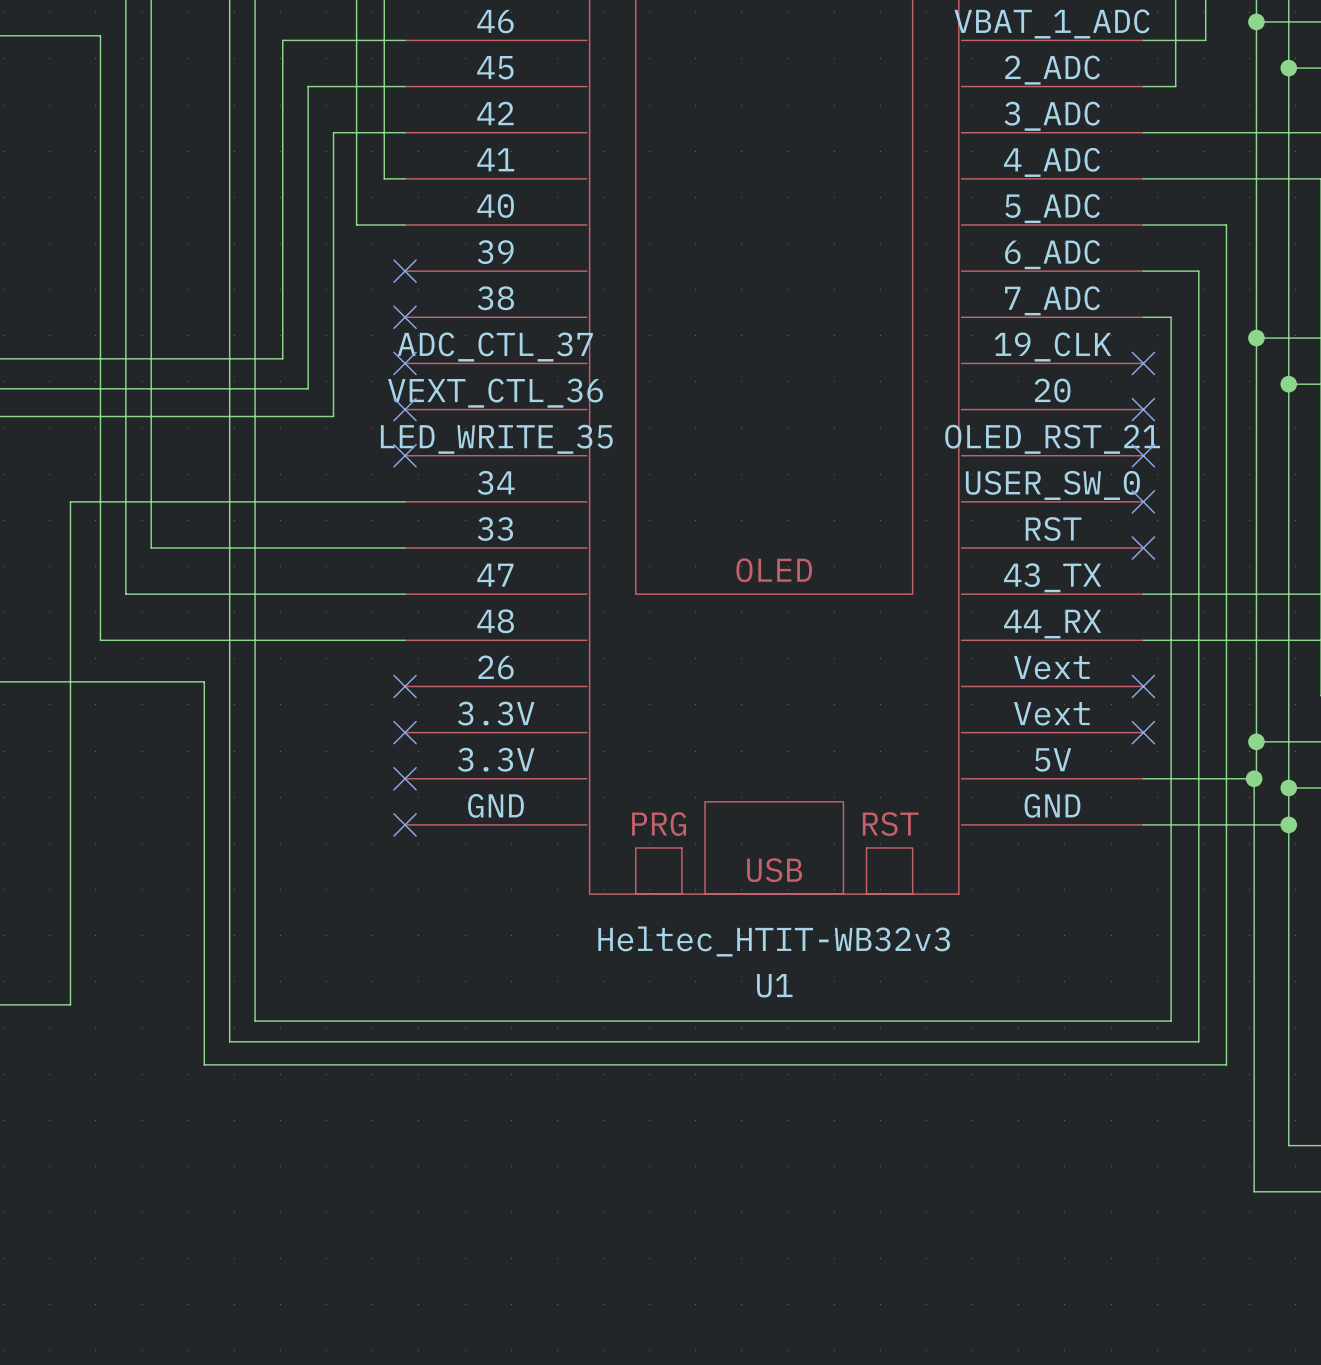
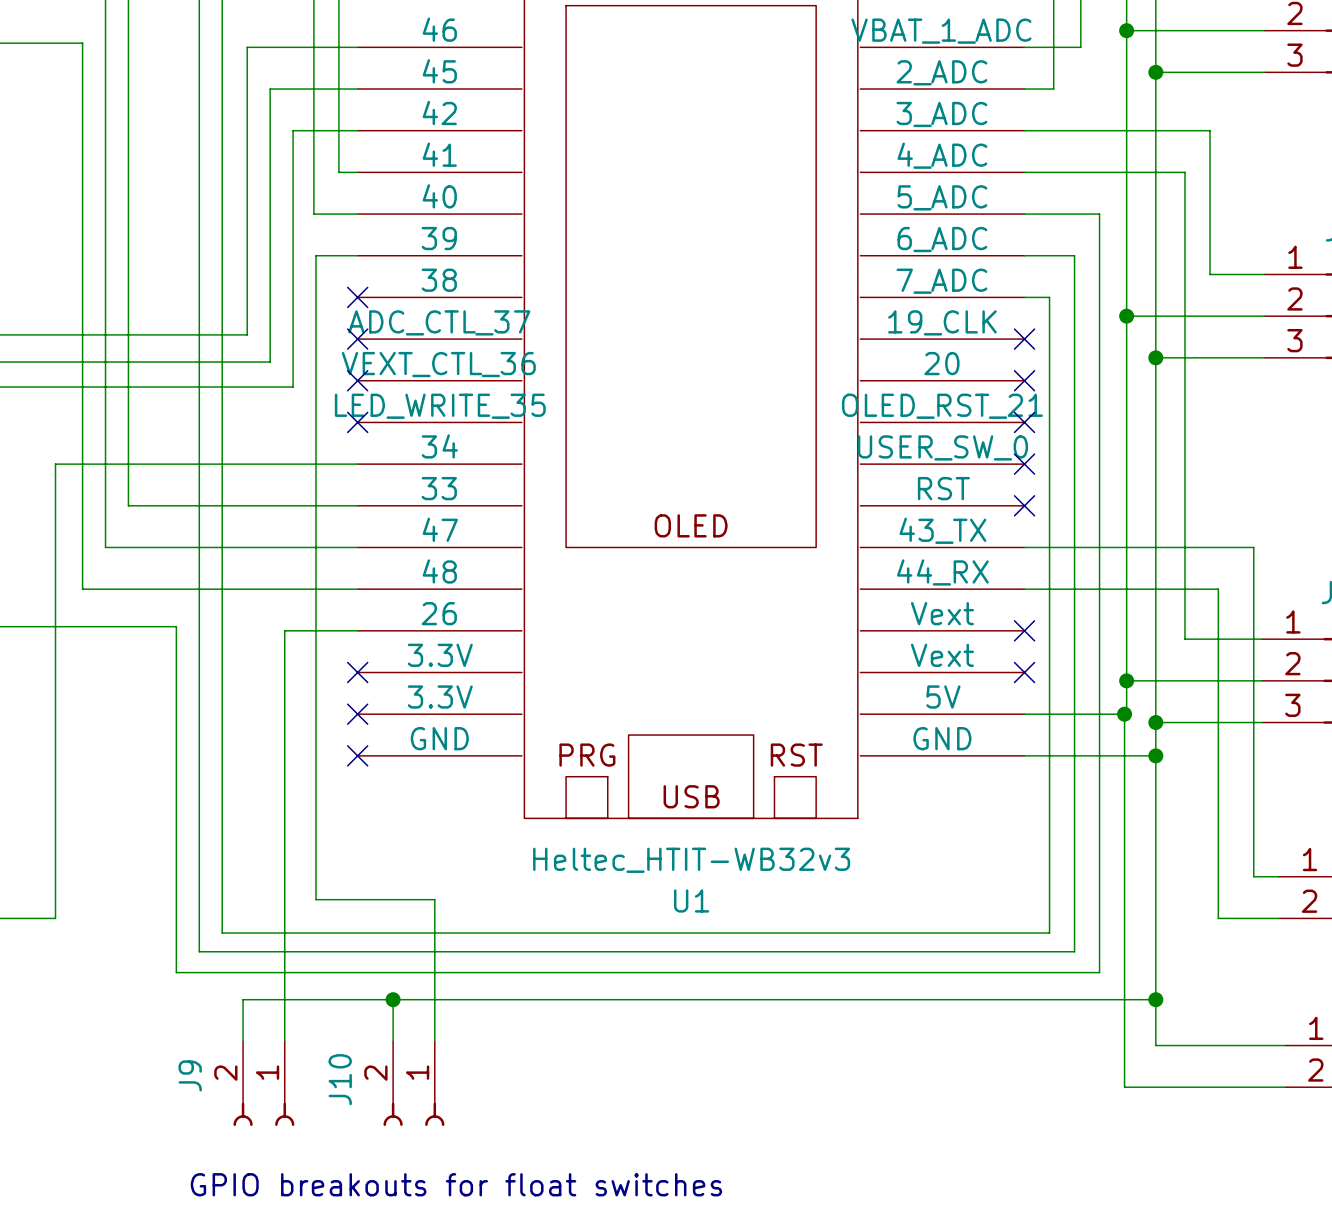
wire: none -> (357, 255) (315, 255) (315, 899) (434, 899) (434, 1041)
no-connect mark: (405, 271) -> none
wire: none -> (357, 630) (284, 630) (284, 1041)
no-connect mark: (405, 686) -> none
wire: none -> (393, 999) (393, 1041)
junction: none -> (393, 999)
wire: none -> (1155, 999) (243, 999) (243, 1041)
junction: none -> (1155, 999)
J9: none -> (263, 1083)
J10: none -> (413, 1083)
text: none -> GPIO breakouts for float switches (456, 1184)

